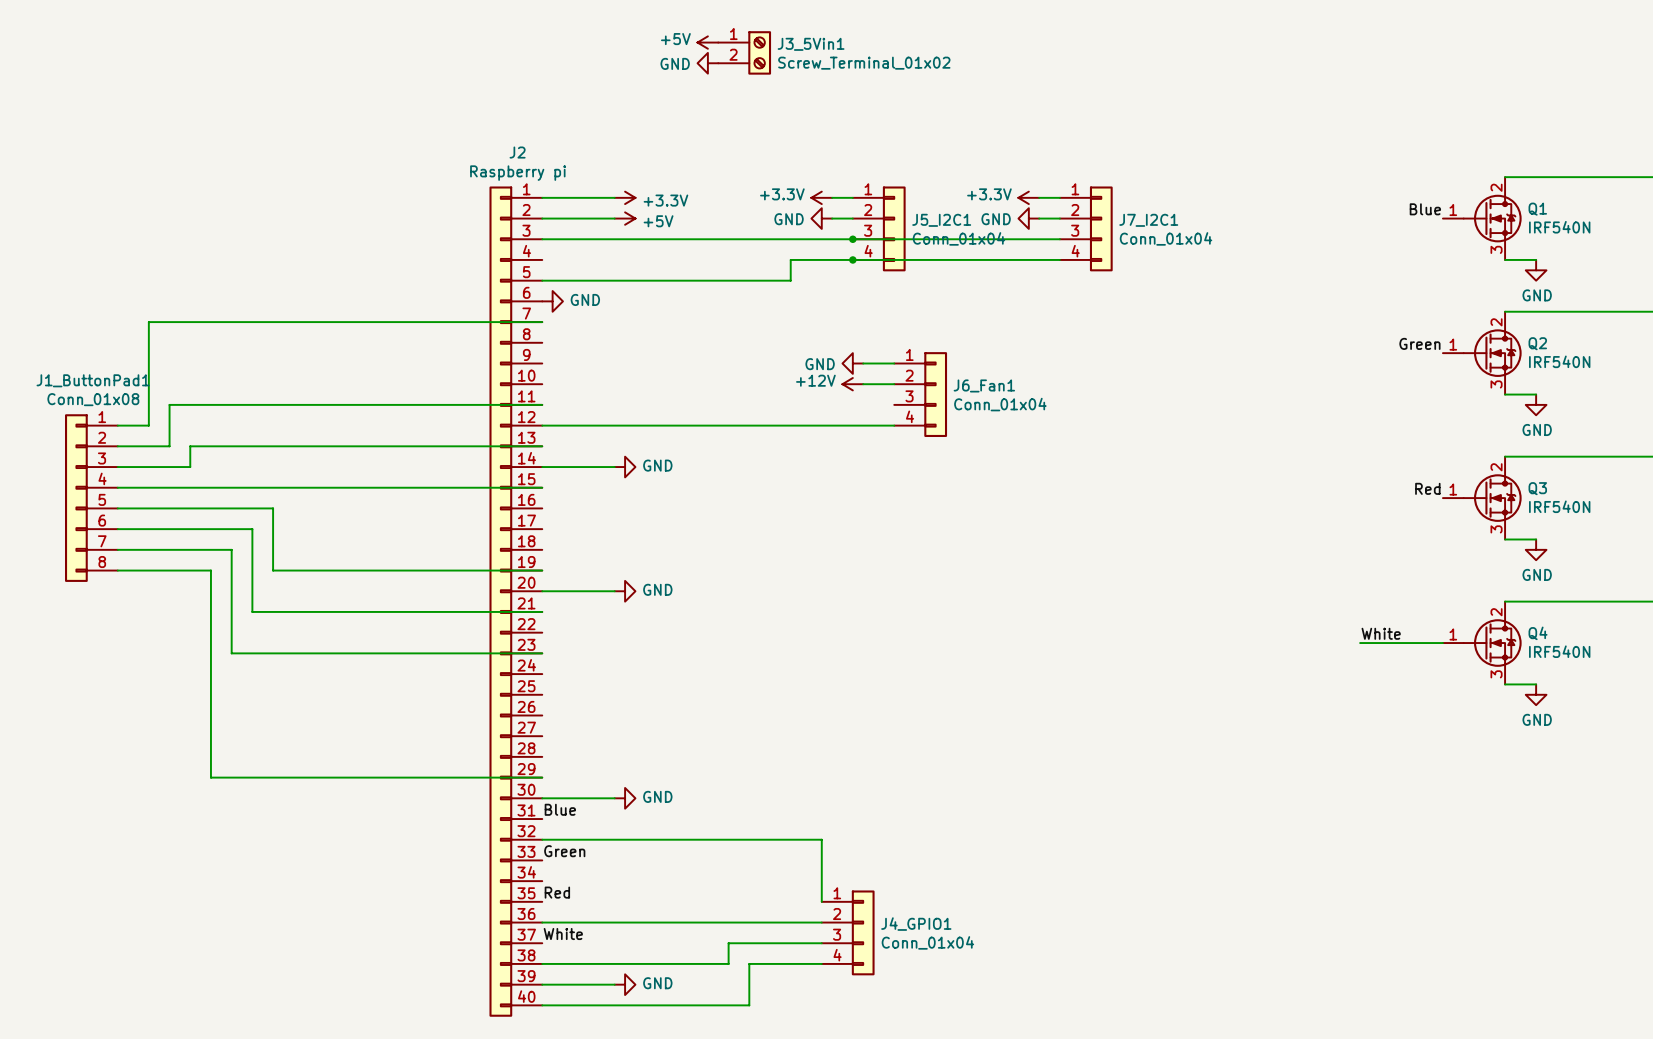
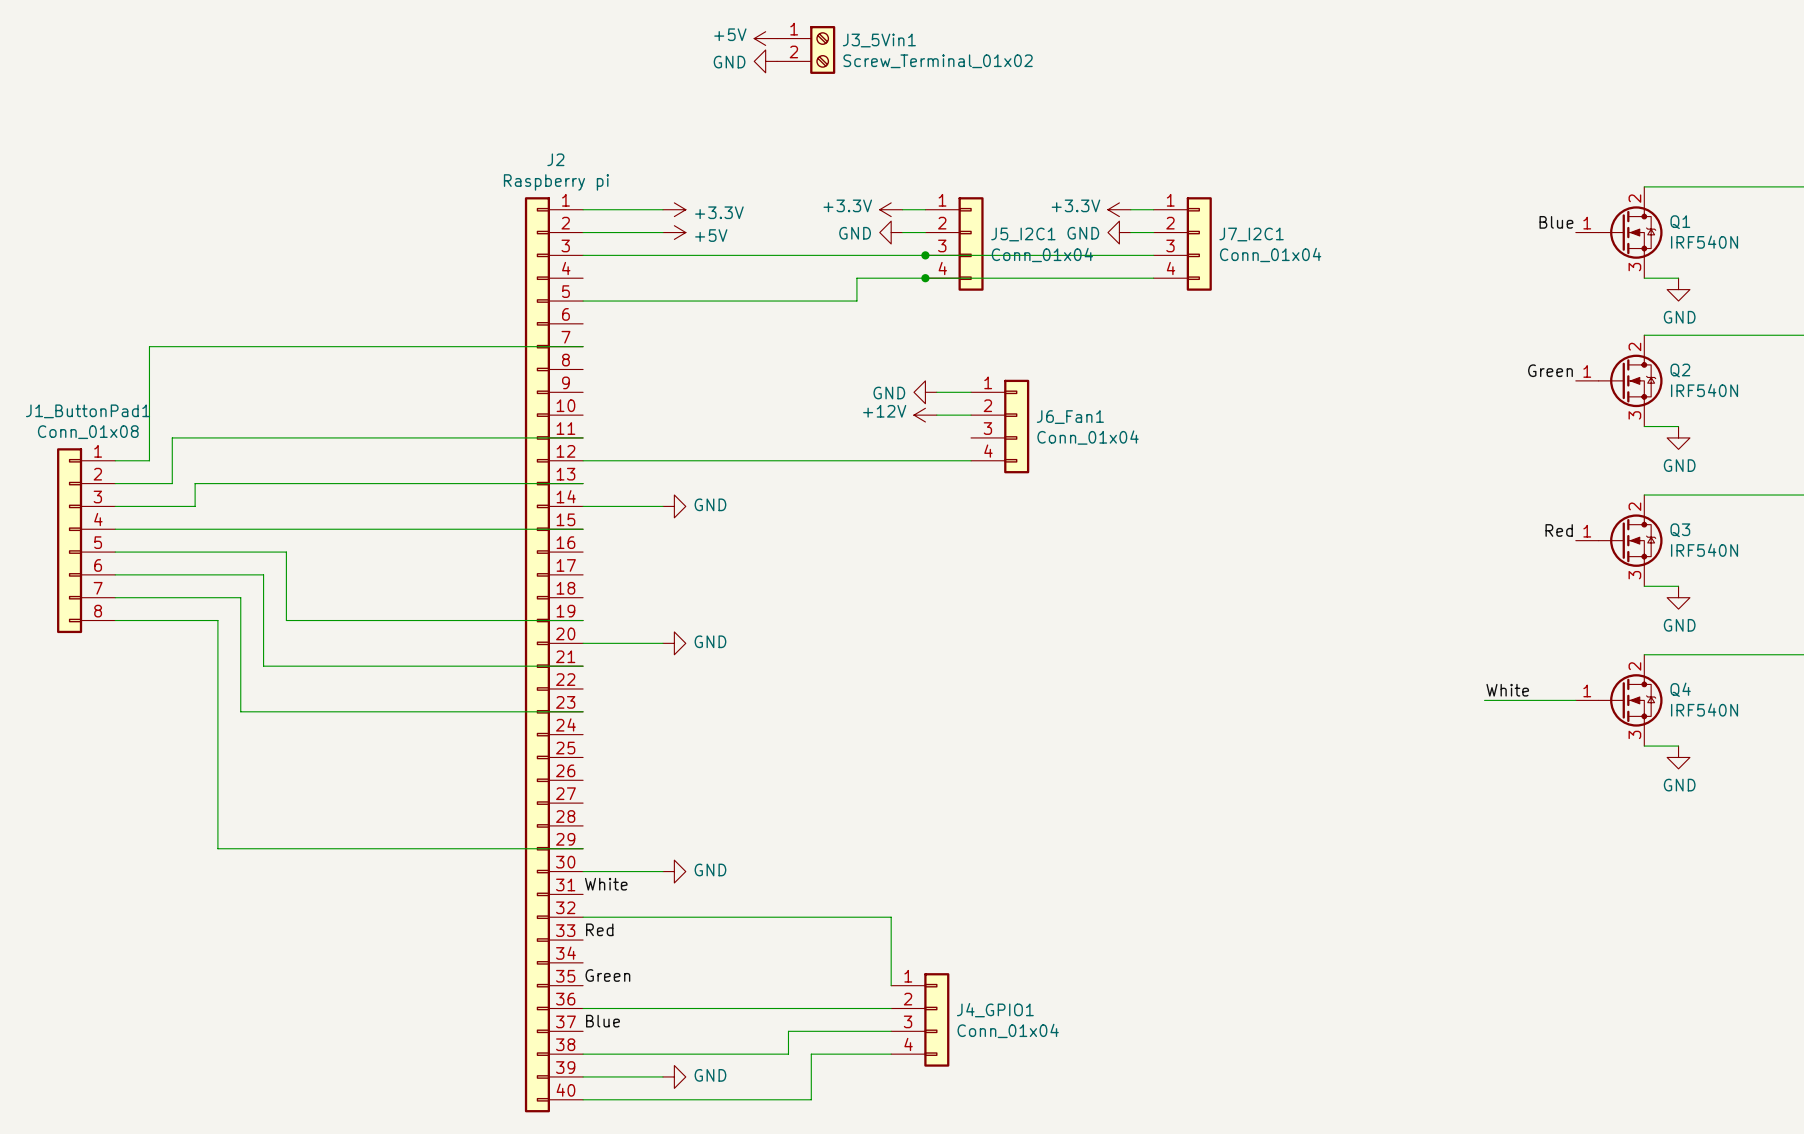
power symbol: GND (552, 301) -> none
label: Blue (560, 809) -> White (606, 884)
label: Green (564, 851) -> Red (599, 929)
label: Red (557, 892) -> Green (607, 975)
label: White (563, 934) -> Blue (603, 1021)

